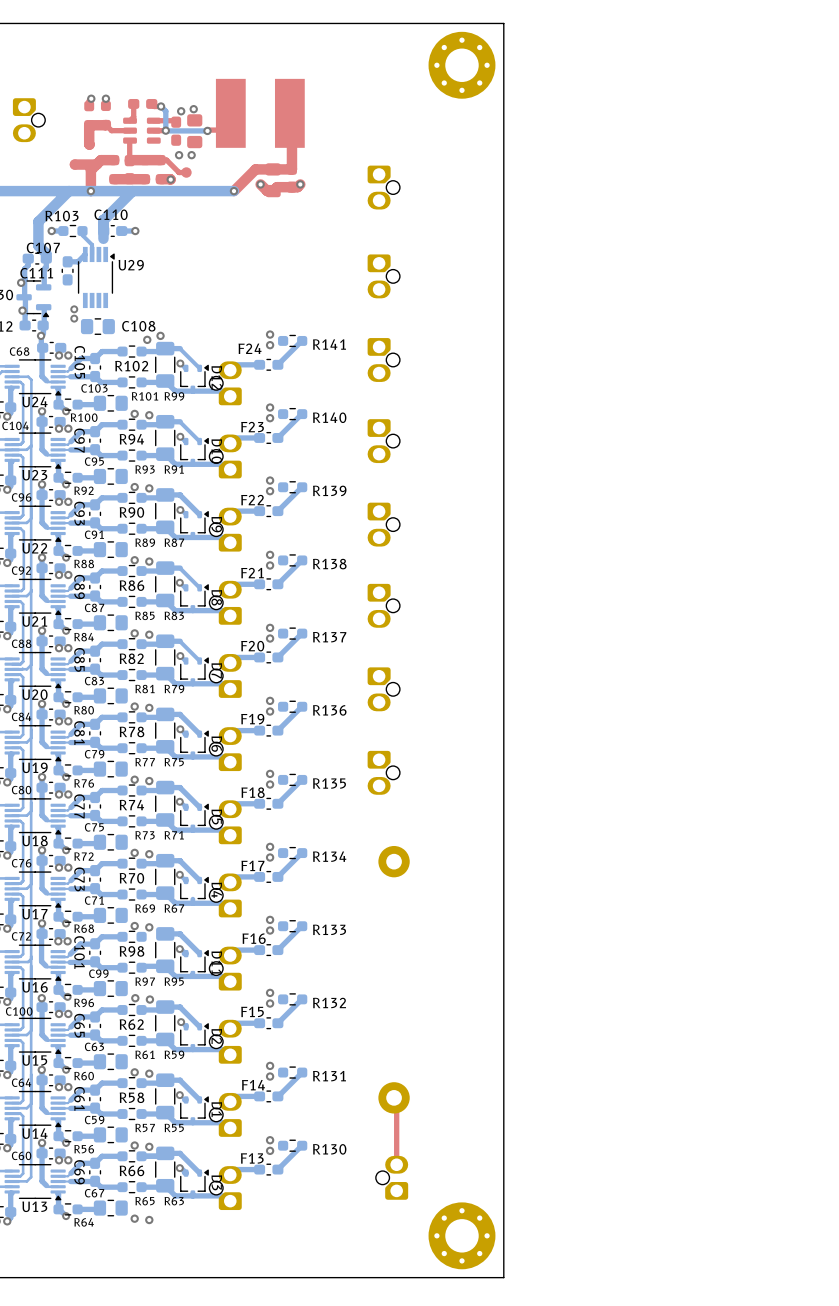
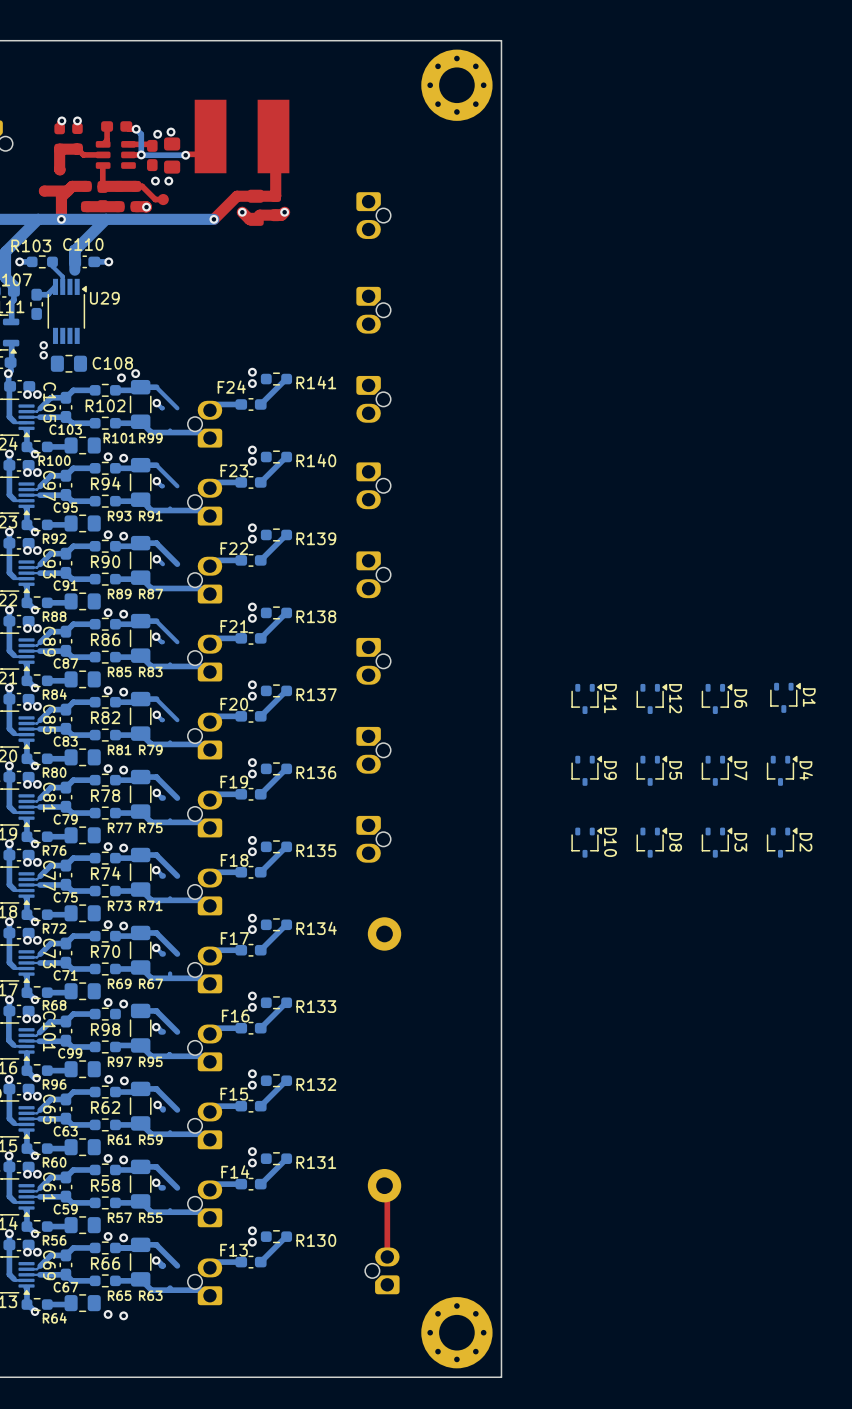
D12 position: (194, 378) -> (651, 698)
D10 position: (194, 451) -> (586, 842)
D9 position: (194, 525) -> (586, 770)
D8 position: (194, 598) -> (651, 842)
D7 position: (194, 671) -> (717, 770)
D6 position: (194, 744) -> (717, 698)
D5 position: (194, 817) -> (651, 770)
D4 position: (194, 890) -> (782, 770)
D11 position: (194, 964) -> (586, 698)
D2 position: (194, 1037) -> (782, 842)
D1 position: (194, 1110) -> (785, 697)
D3 position: (194, 1183) -> (717, 842)

